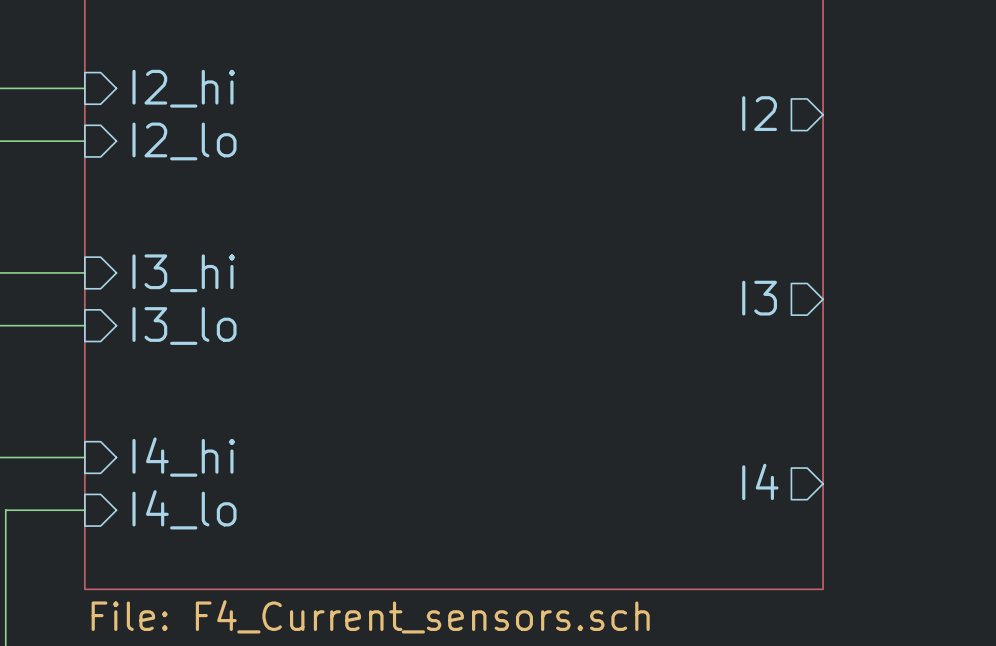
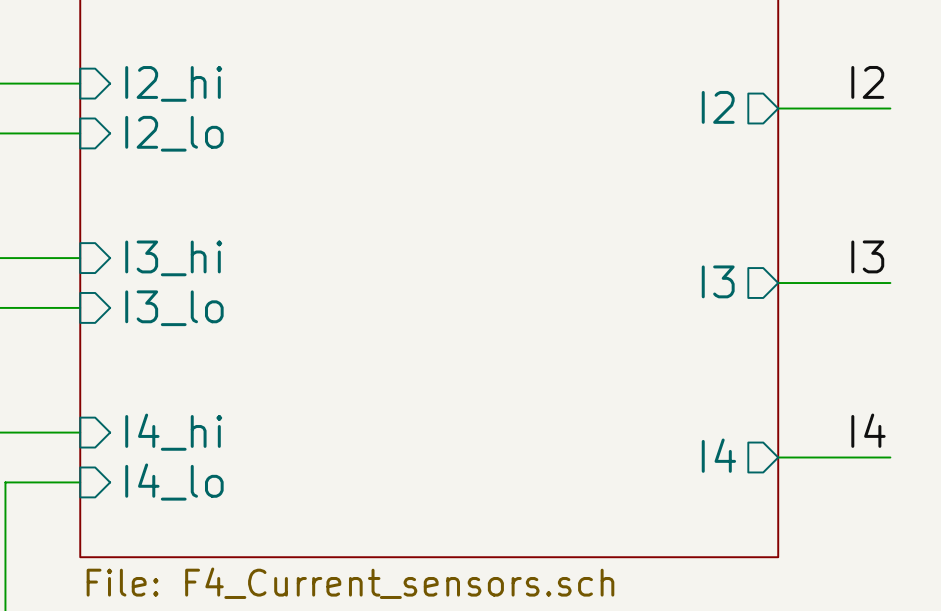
label: none -> I2 (867, 82)
wire: none -> (778, 108) (890, 108)
label: none -> I3 (867, 256)
wire: none -> (778, 283) (890, 283)
label: none -> I4 (868, 430)
wire: none -> (778, 457) (890, 457)

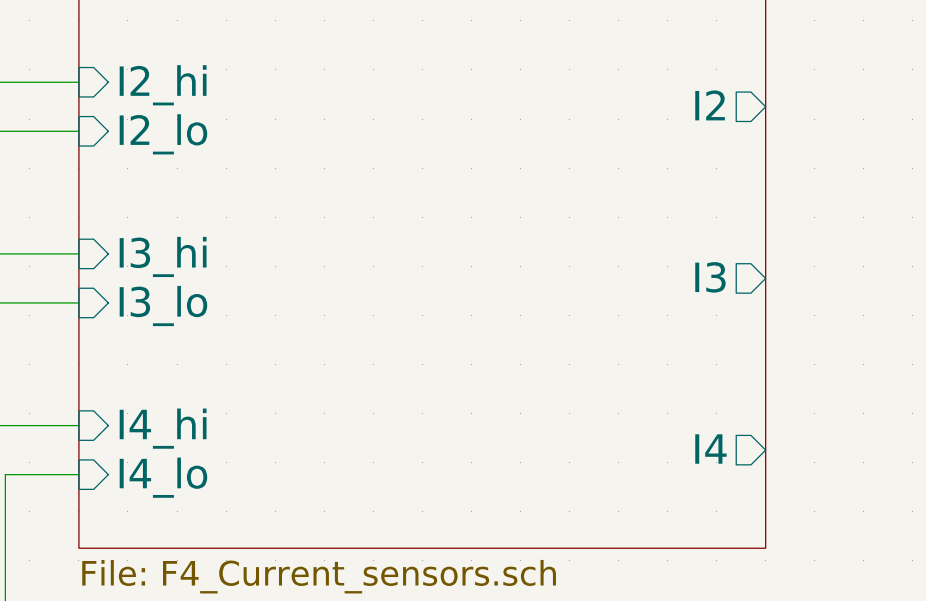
label: I2 (867, 82) -> none
wire: (778, 108) (890, 108) -> none
label: I3 (867, 256) -> none
wire: (778, 283) (890, 283) -> none
label: I4 (868, 430) -> none
wire: (778, 457) (890, 457) -> none

